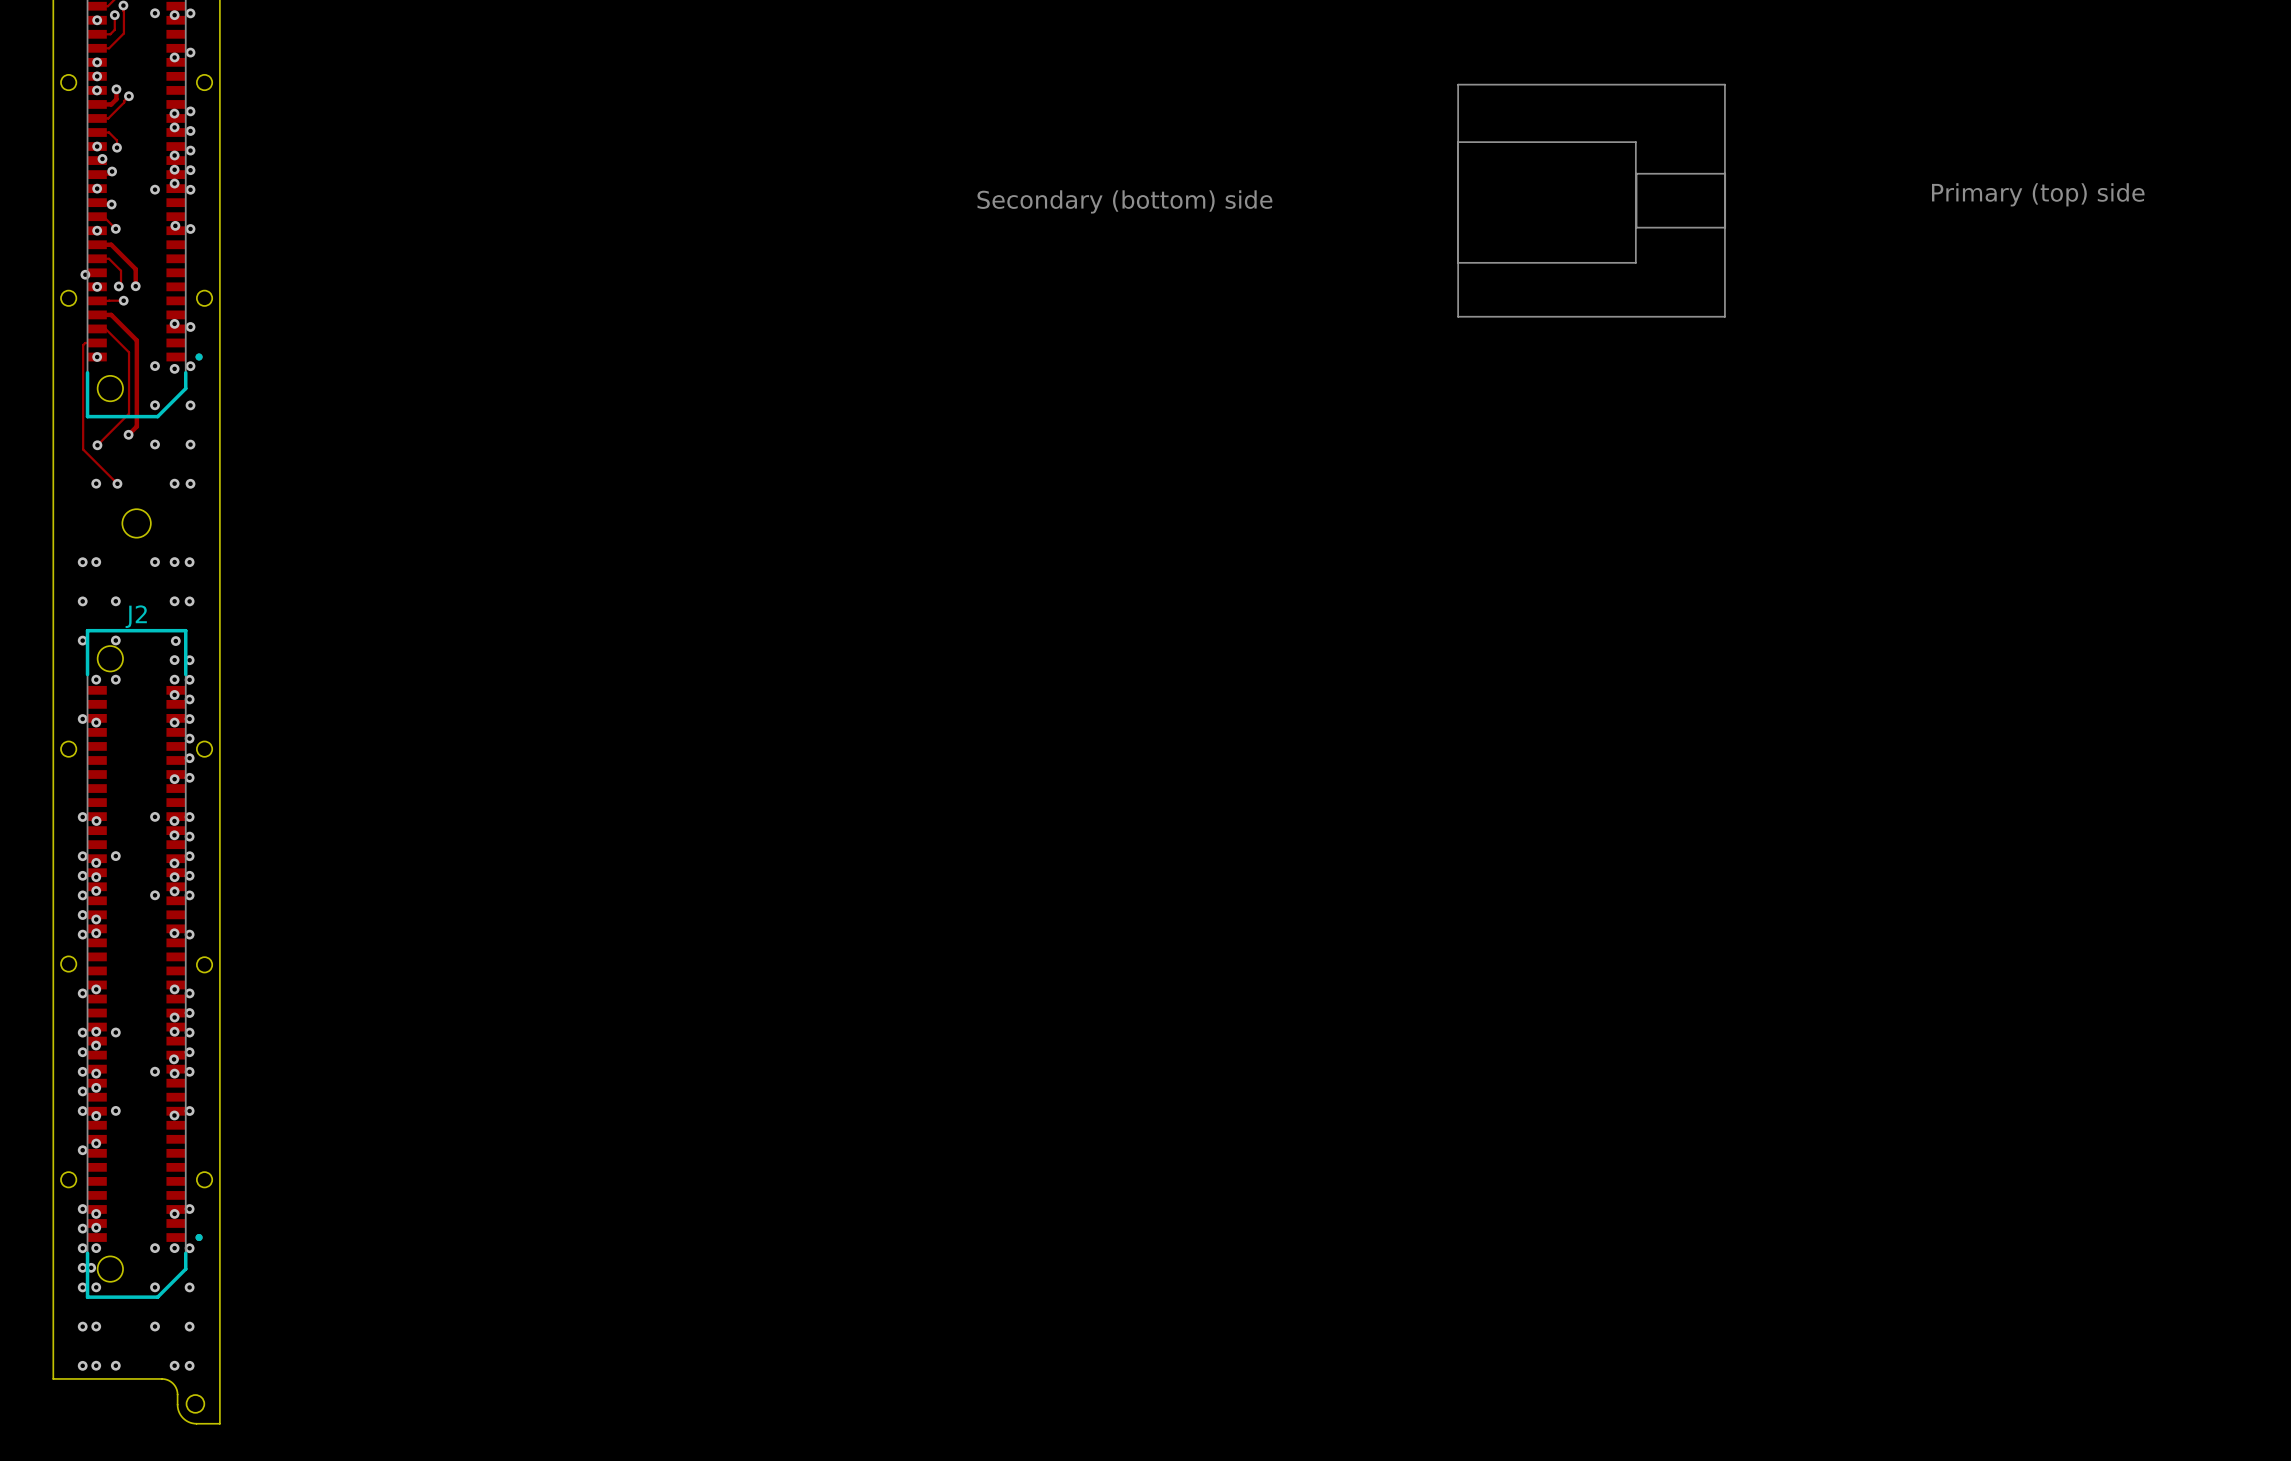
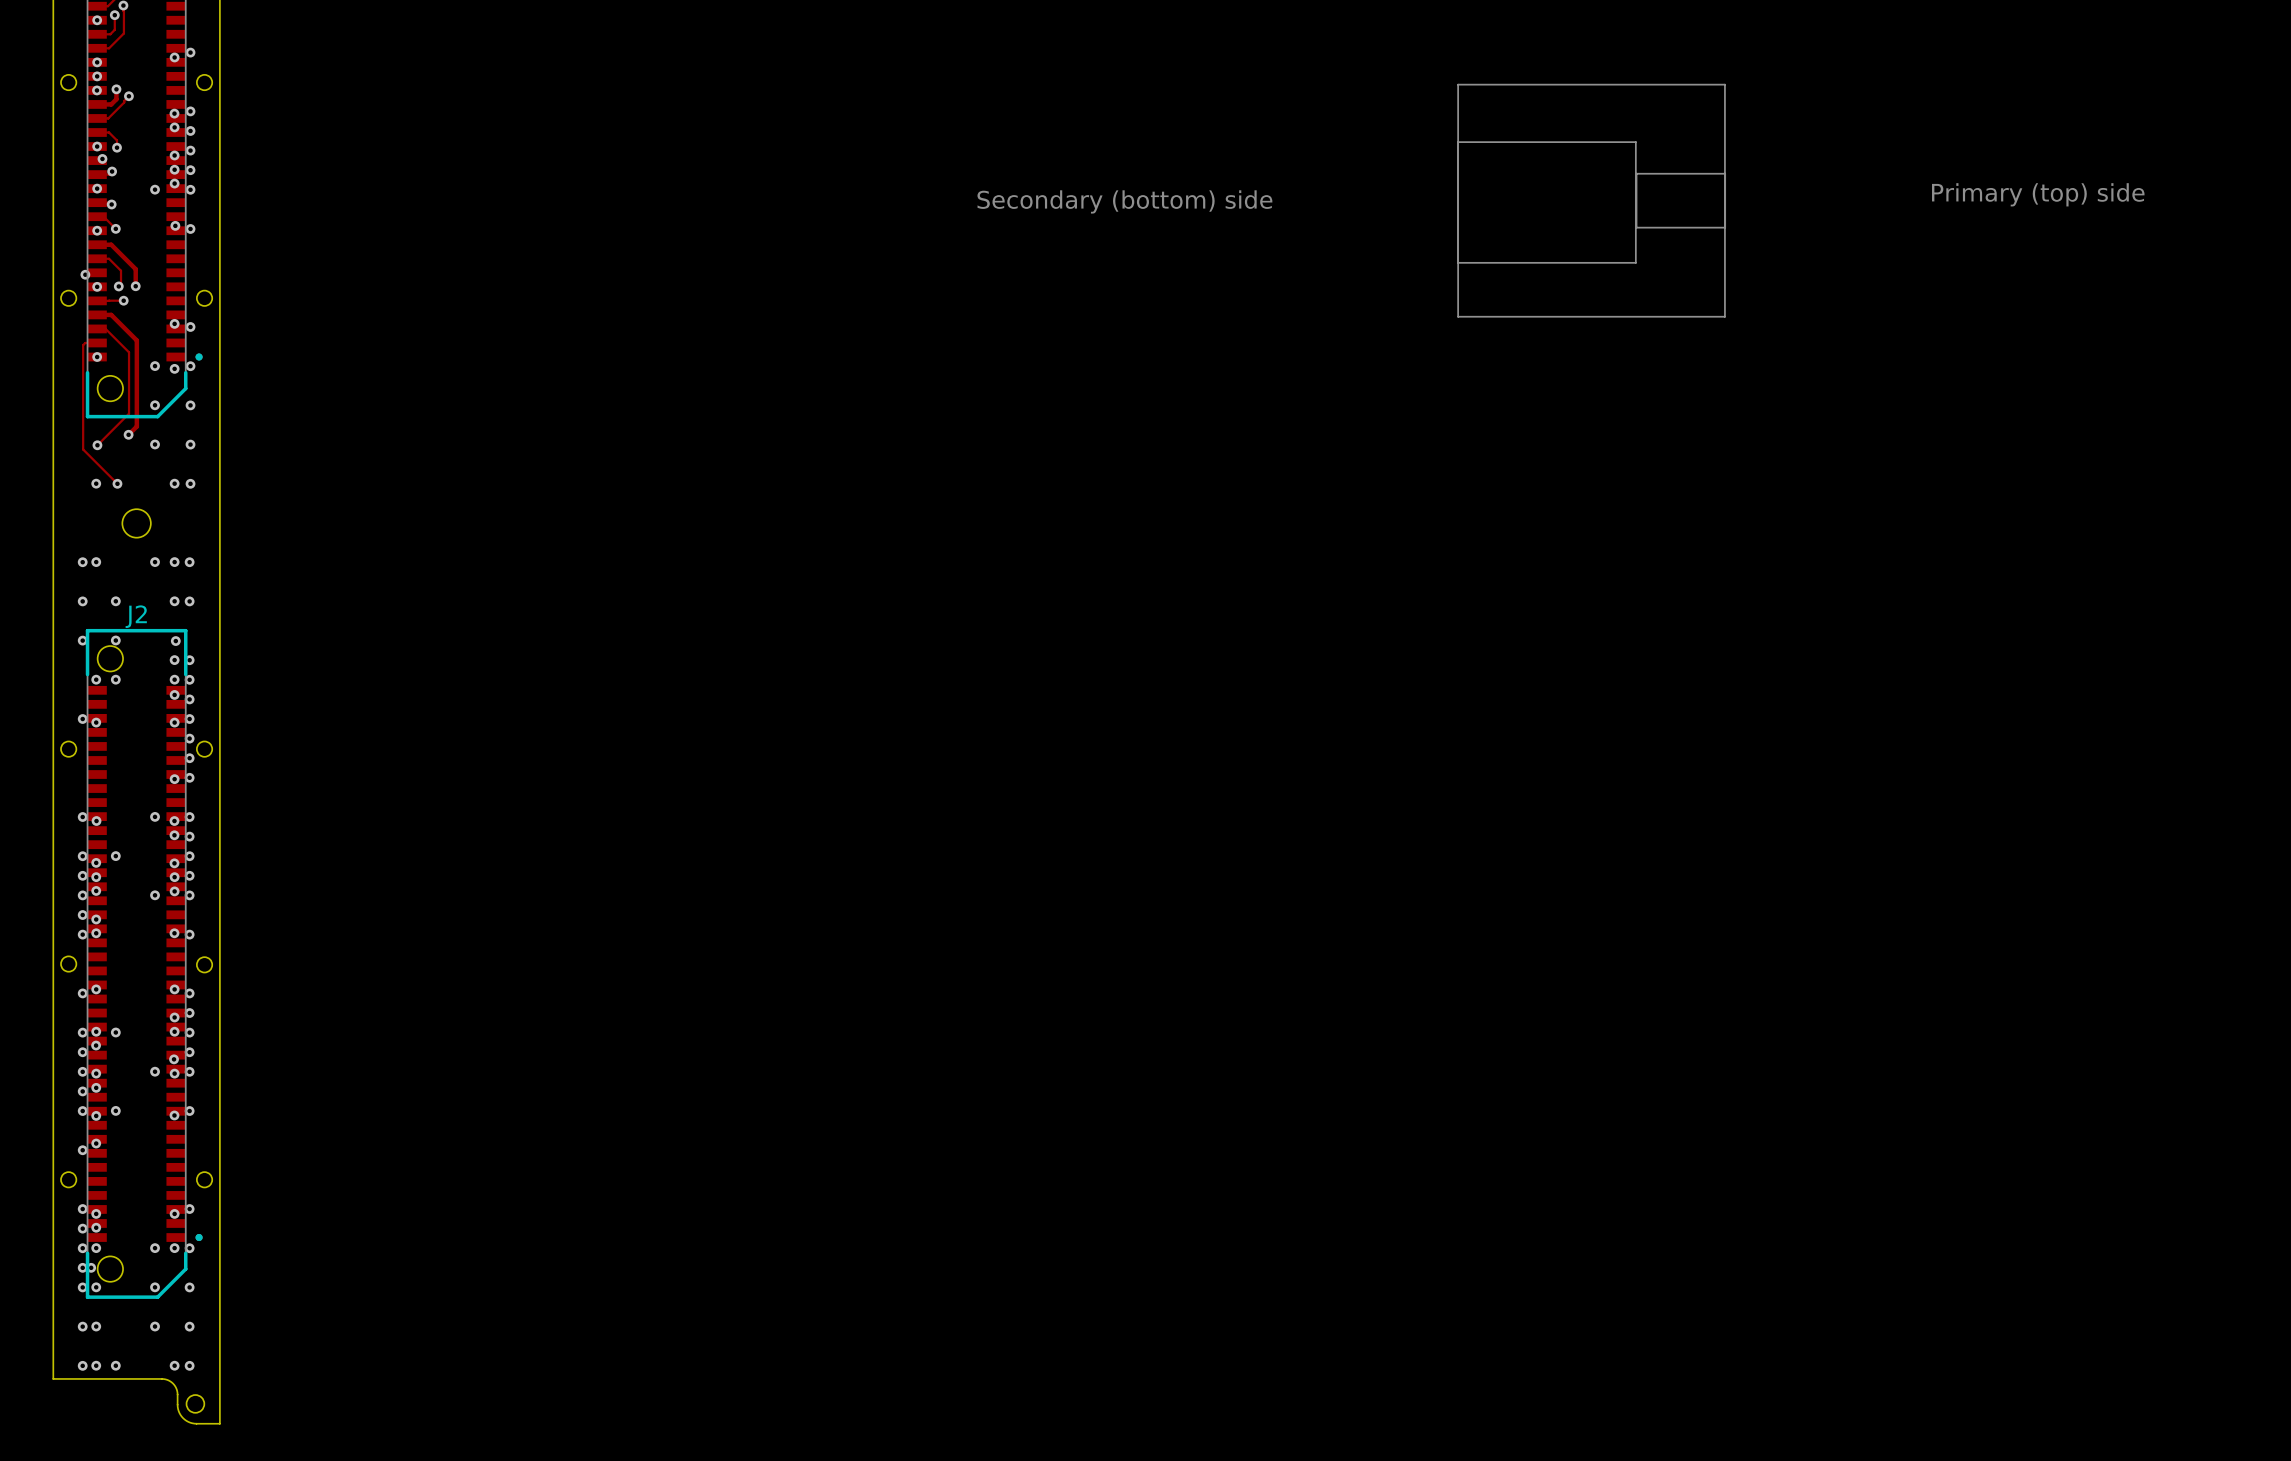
via: (155, 13) -> none
via: (190, 13) -> none
via: (174, 15) -> none

